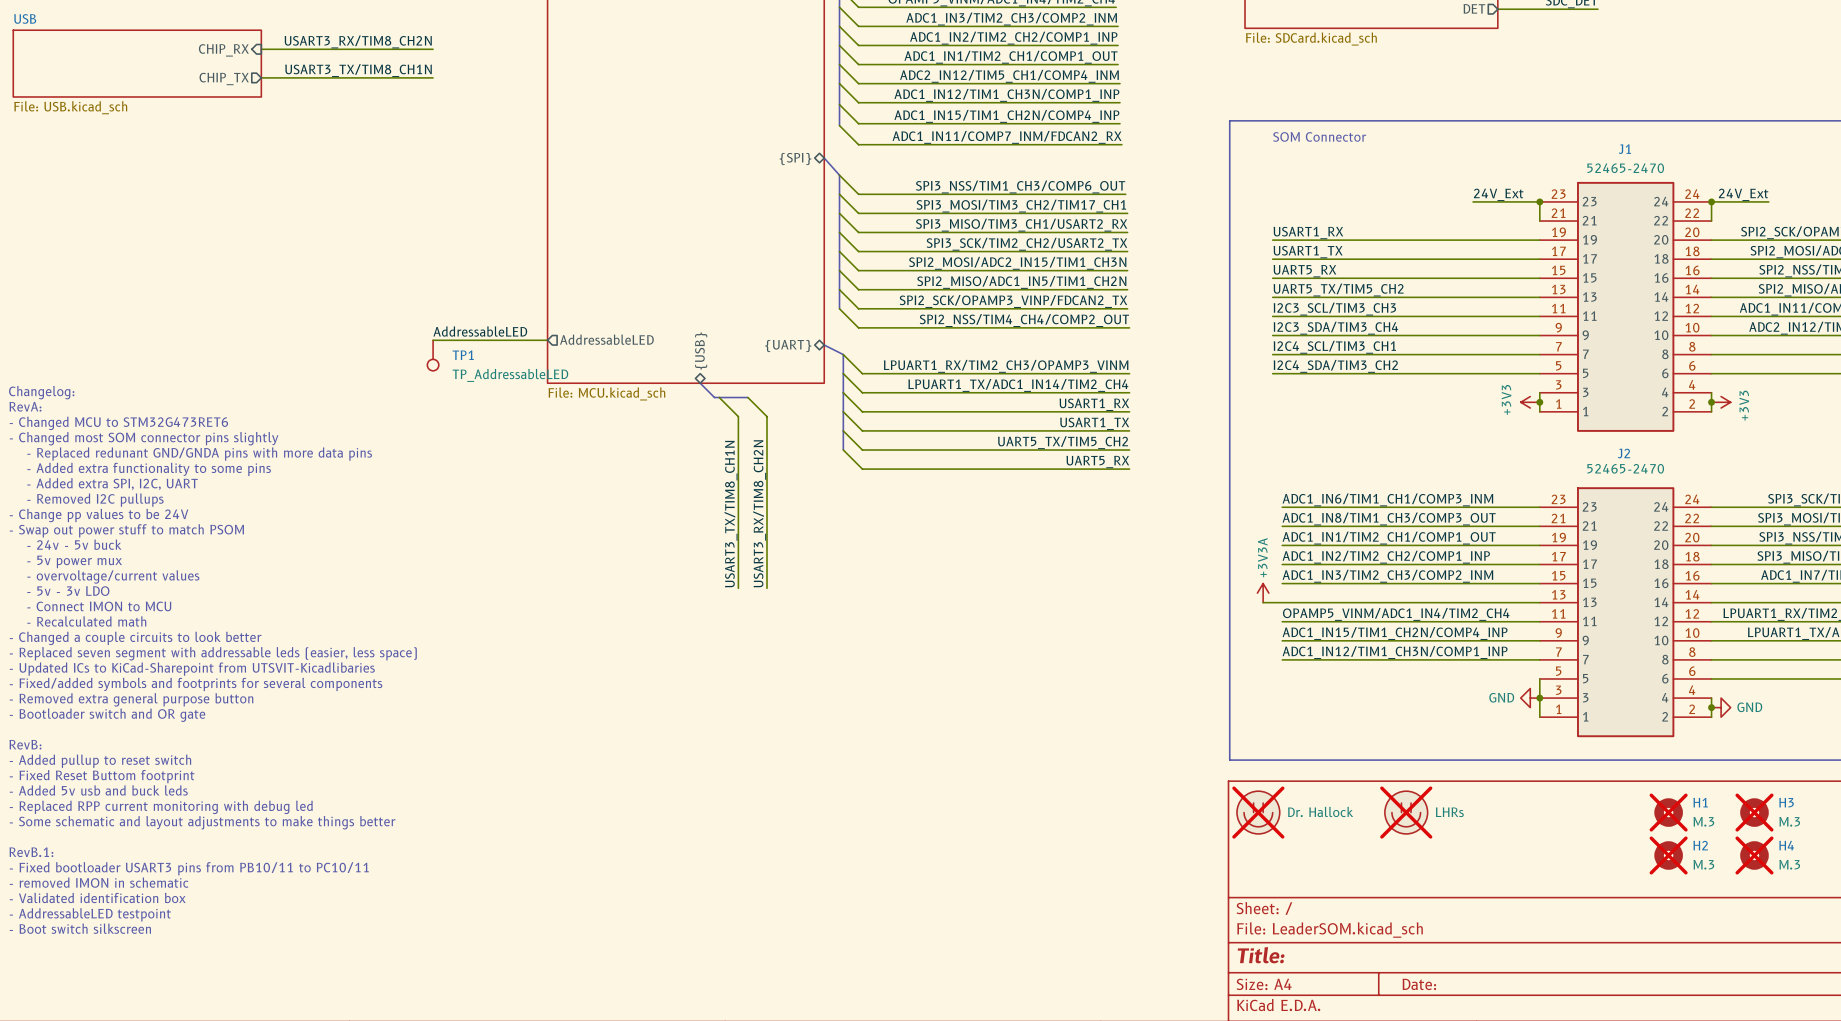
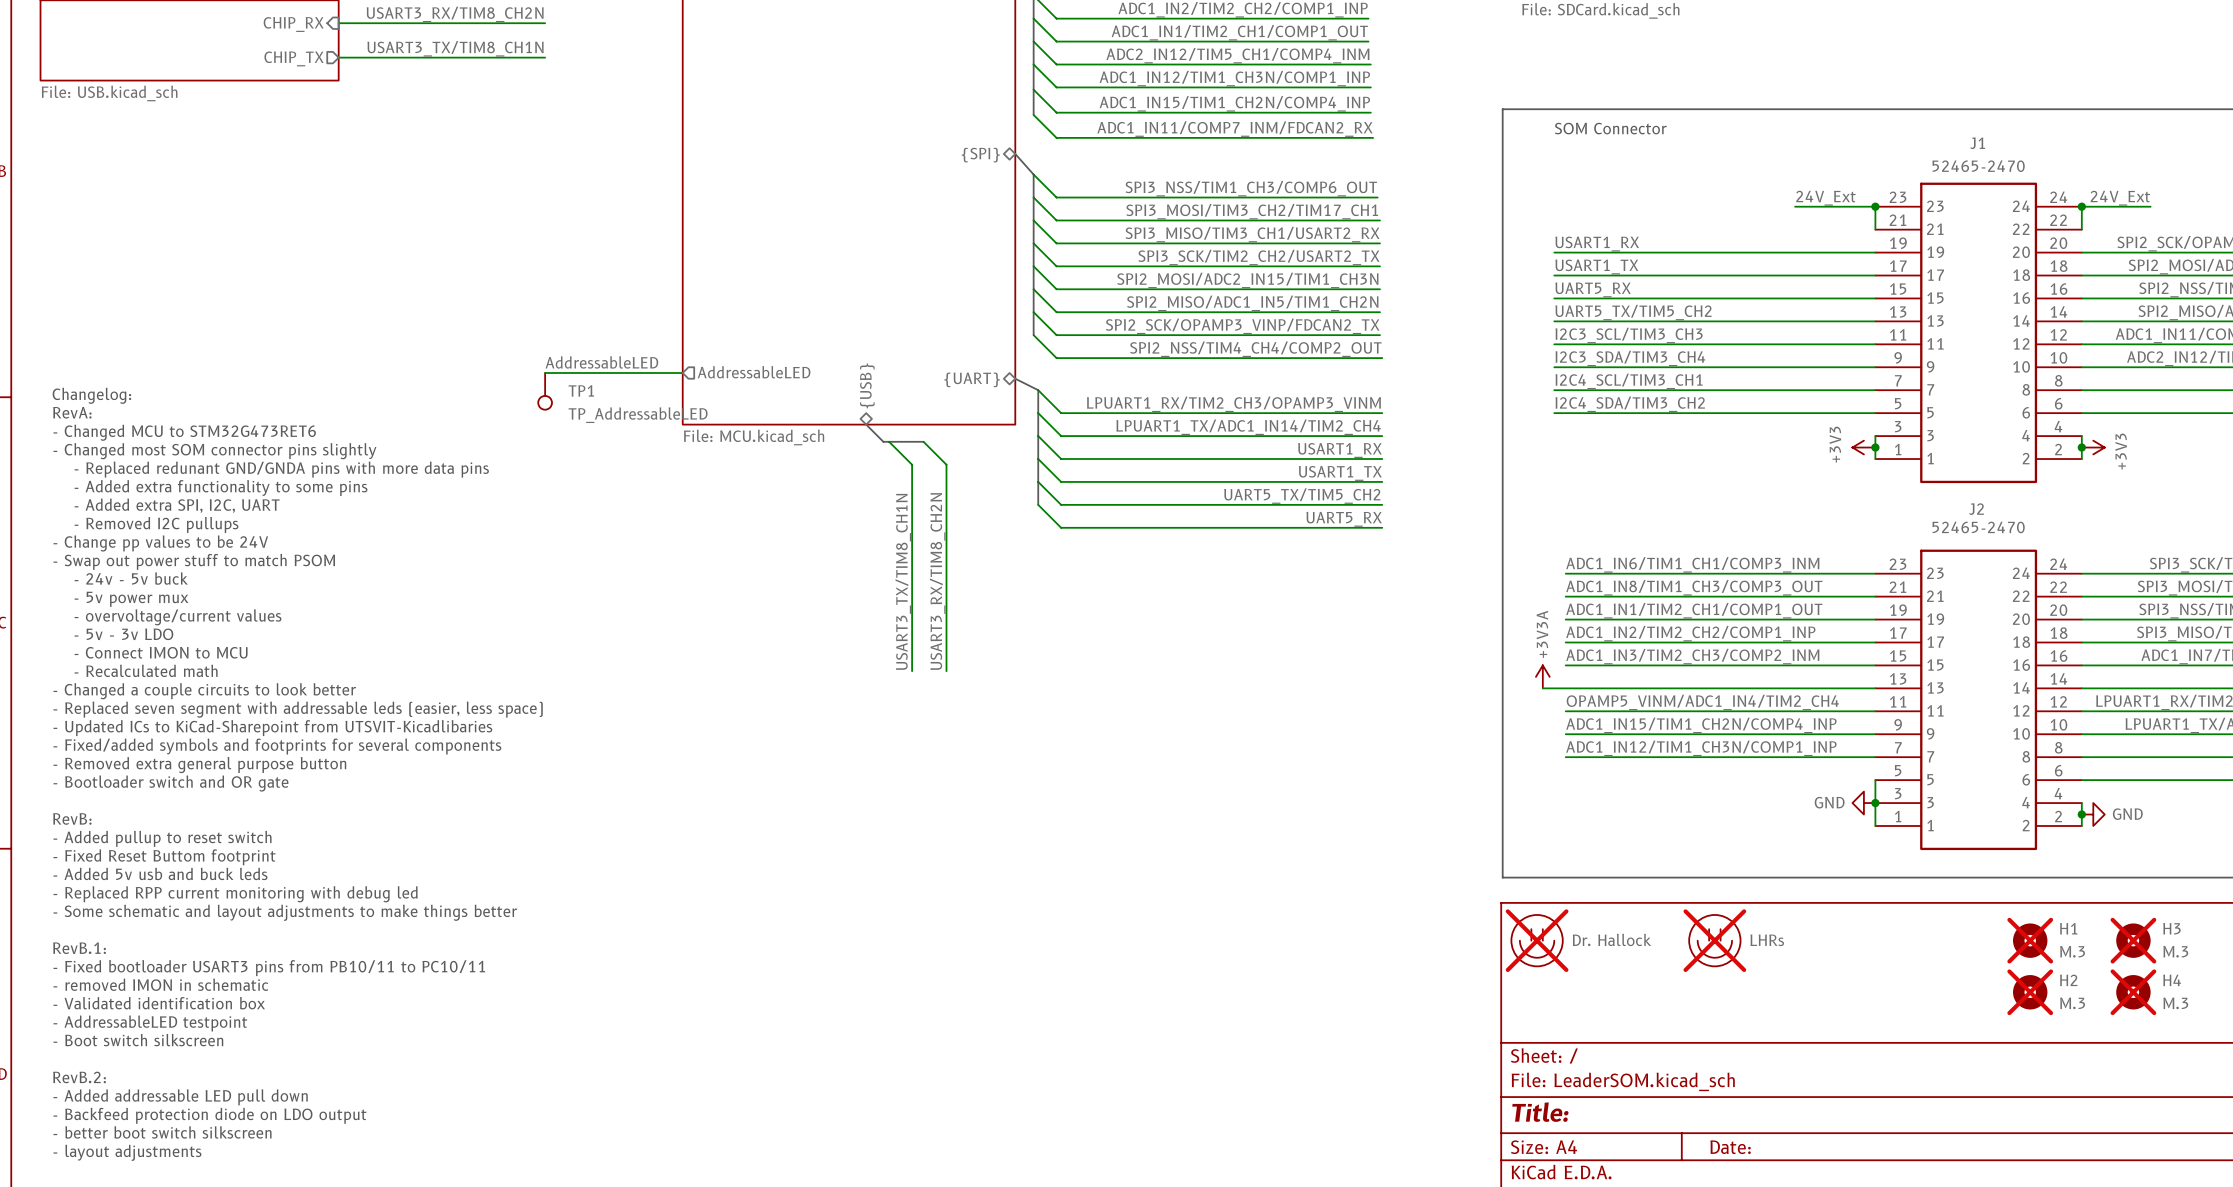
text position: Changelog: (41, 392) -> Changelog: (91, 395)
text position: RevA: (25, 406) -> RevA: (72, 412)
text position: - Changed MCU to STM32G473RET6 (118, 423) -> - Changed MCU to STM32G473RET6 (184, 432)
text position: - Changed most SOM connector pins slightly (144, 438) -> - Changed most SOM connector pins slightly (214, 451)
text position: - Replaced redunant GND/GNDA pins with more data pins (199, 454) -> - Replaced redunant GND/GNDA pins with more data pins (281, 469)
text position: - Added extra functionality to some pins (149, 469) -> - Added extra functionality to some pins (221, 488)
text position: - Added extra SPI, I2C, UART (112, 484) -> - Added extra SPI, I2C, UART (177, 505)
text position: - Removed I2C pullups (95, 500) -> - Removed I2C pullups (156, 524)
text position: - Change pp values to be 24V (99, 515) -> - Change pp values to be 24V (160, 543)
text position: - Swap out power stuff to match PSOM (126, 530) -> - Swap out power stuff to match PSOM (194, 561)
text position: - 24v - 5v buck (74, 544) -> - 24v - 5v buck (131, 578)
text position: - 5v power mux (74, 561) -> - 5v power mux (131, 599)
text position: - overvoltage/current values (113, 576) -> - overvoltage/current values (178, 617)
text position: - 5v - 3v LDO (68, 591) -> - 5v - 3v LDO (123, 634)
text position: - Connect IMON to MCU (99, 606) -> - Connect IMON to MCU (161, 652)
text position: - Recalculated math (86, 621) -> - Recalculated math (146, 670)
text position: - Changed a couple circuits to look better (135, 638) -> - Changed a couple circuits to look better (204, 691)
text position: - Replaced seven segment with addressable leds (easier, less space) (213, 653) -> - Replaced seven segment with addressable leds (easier, less space) (298, 709)
text position: - Updated ICs to KiCad-Sharepoint from UTSVIT-Kicadlibaries (192, 669) -> - Updated ICs to KiCad-Sharepoint from UTSVIT-Kicadlibaries (272, 728)
text position: - Fixed/added symbols and footprints for several components (196, 684) -> - Fixed/added symbols and footprints for several components (277, 746)
text position: - Removed extra general purpose button (131, 699) -> - Removed extra general purpose button (199, 765)
text position: - Bootloader switch and OR gate (107, 715) -> - Bootloader switch and OR gate (170, 783)
text position: RevB: (25, 744) -> RevB: (72, 818)
text position: - Added pullup to reset switch (100, 761) -> - Added pullup to reset switch (162, 838)
text position: - Fixed Reset Buttom footprint (102, 776) -> - Fixed Reset Buttom footprint (164, 857)
text position: - Added 5v usb and buck leds (98, 790) -> - Added 5v usb and buck leds (160, 873)
text position: - Replaced RPP current monitoring with debug led (161, 807) -> - Replaced RPP current monitoring with debug led (235, 894)
text position: - Some schematic and layout adjustments to make things better (202, 822) -> - Some schematic and layout adjustments to make things better (285, 912)
text position: RevB.1: (31, 852) -> RevB.1: (79, 948)
text position: - Fixed bootloader USART3 pins from PB10/11 to PC10/11 (189, 868) -> - Fixed bootloader USART3 pins from PB10/11 to PC10/11 (269, 968)
text position: - removed IMON in schematic (99, 882) -> - removed IMON in schematic (160, 984)
text position: - Validated identification box (97, 897) -> - Validated identification box (159, 1003)
text position: - AddressableLED testpoint (90, 914) -> - AddressableLED testpoint (150, 1023)
text: none -> RevB.2: (79, 1077)
text position: - Boot switch silkscreen (80, 928) -> - Boot switch silkscreen (138, 1040)
text: none -> - Added addressable LED pull down (180, 1097)
text: none -> - Backfeed protection diode on LDO output (209, 1115)
text: none -> - better boot switch silkscreen (162, 1132)
text: none -> - layout adjustments (127, 1152)

